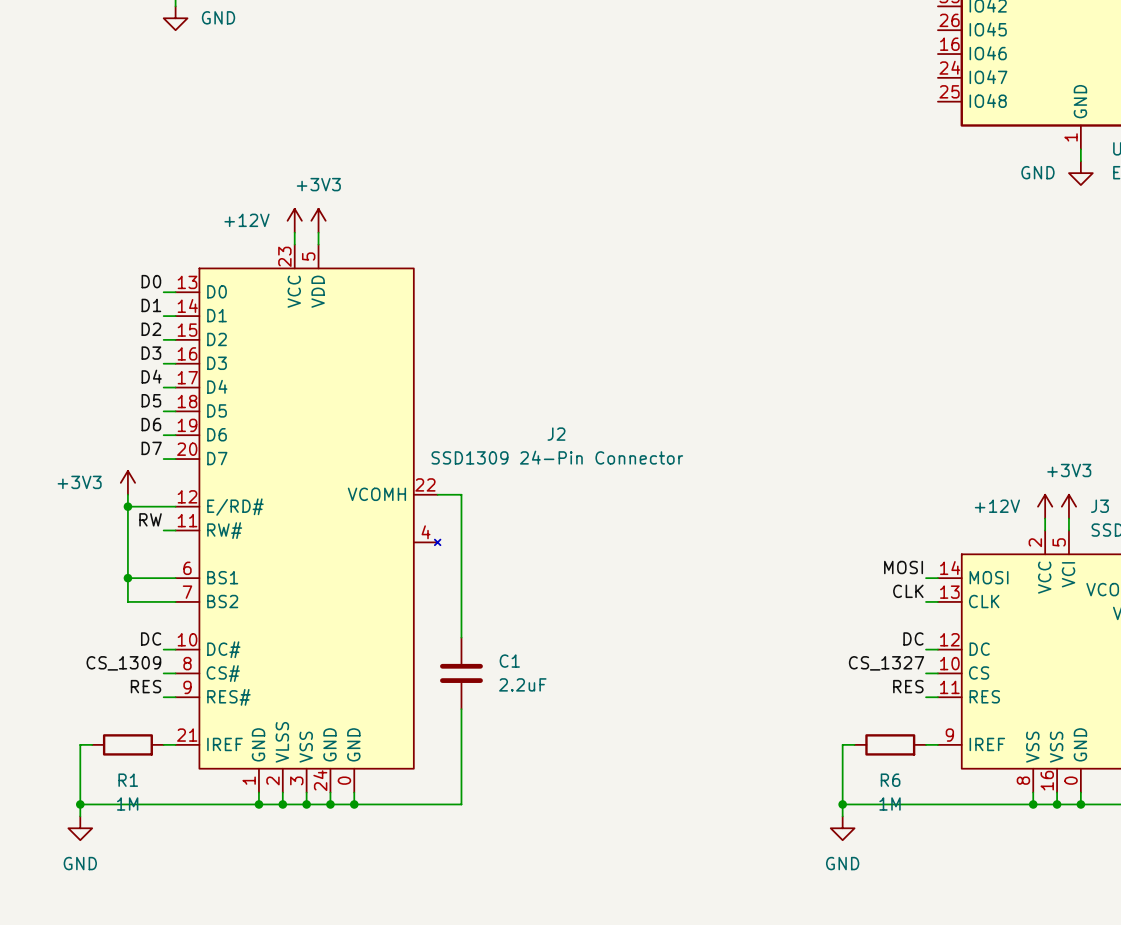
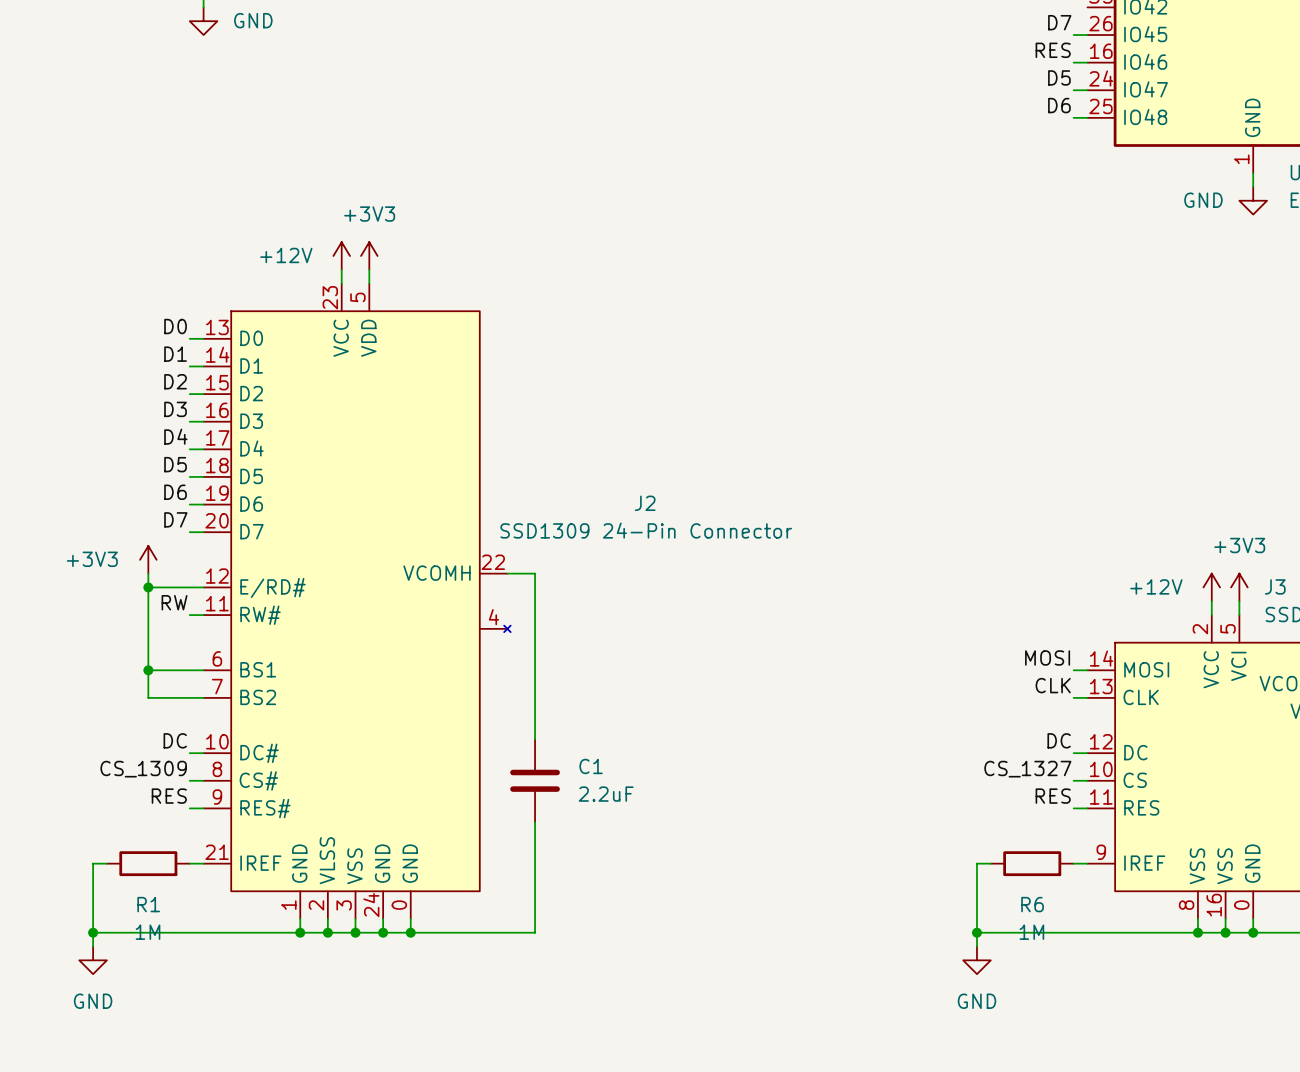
label: none -> D7 (1059, 22)
wire: none -> (1073, 35) (1087, 35)
label: none -> RES (1053, 50)
wire: none -> (1073, 62) (1087, 62)
label: none -> D5 (1059, 77)
wire: none -> (1073, 90) (1087, 90)
label: none -> D6 (1059, 105)
wire: none -> (1073, 117) (1087, 117)

